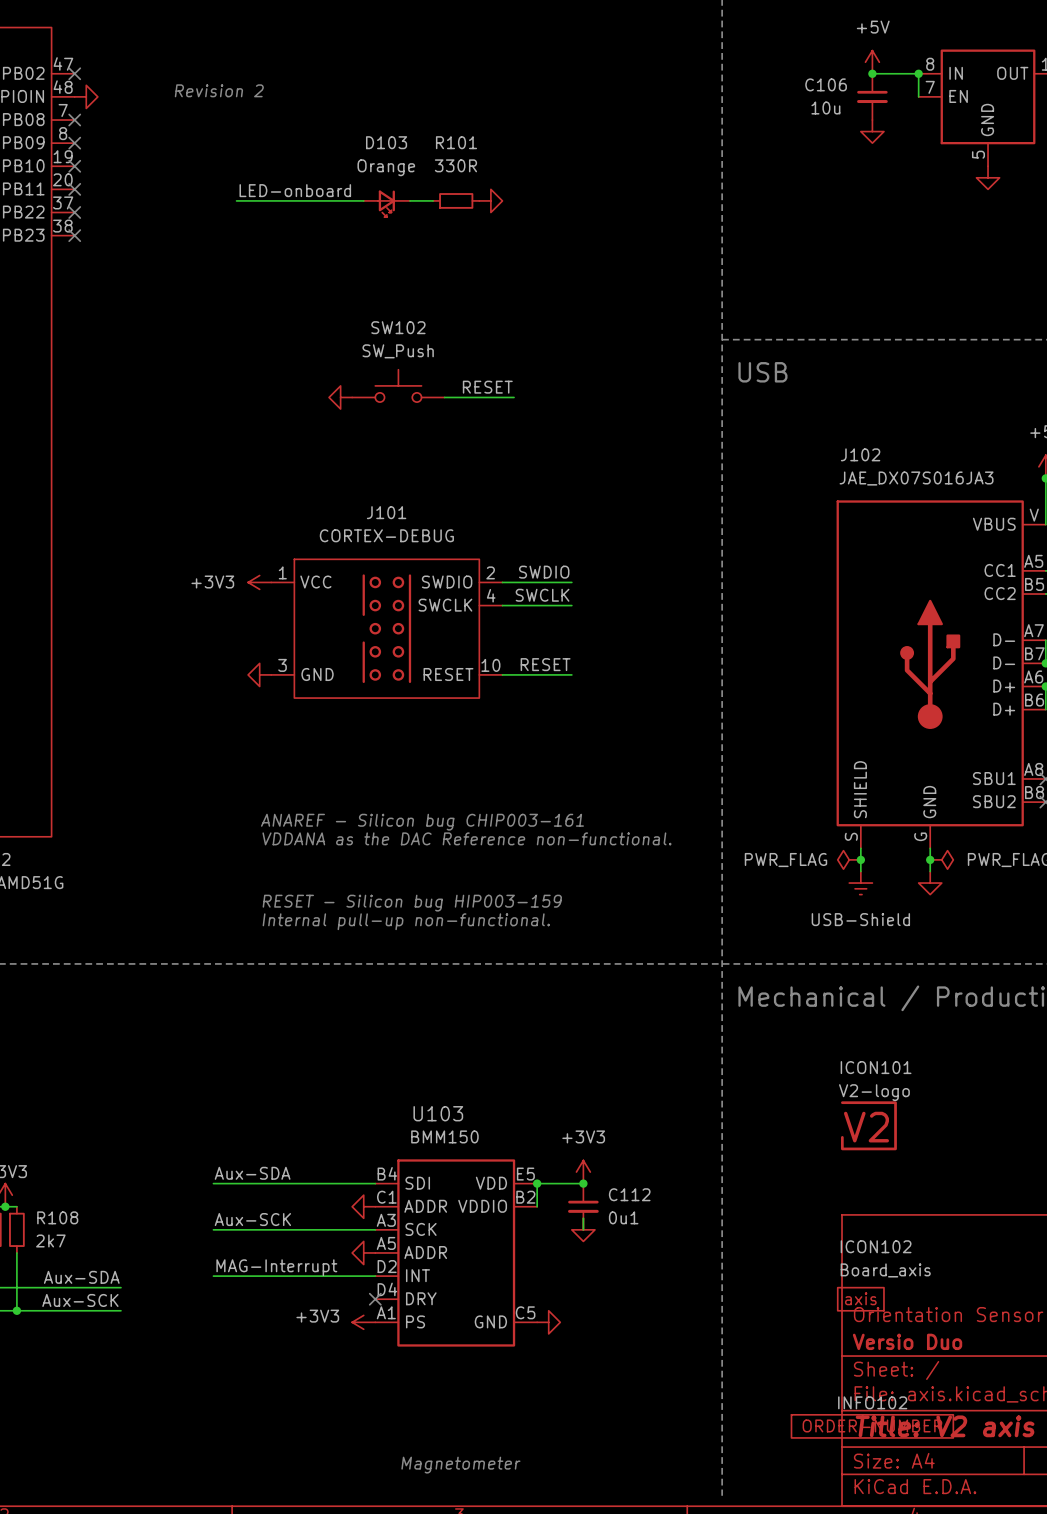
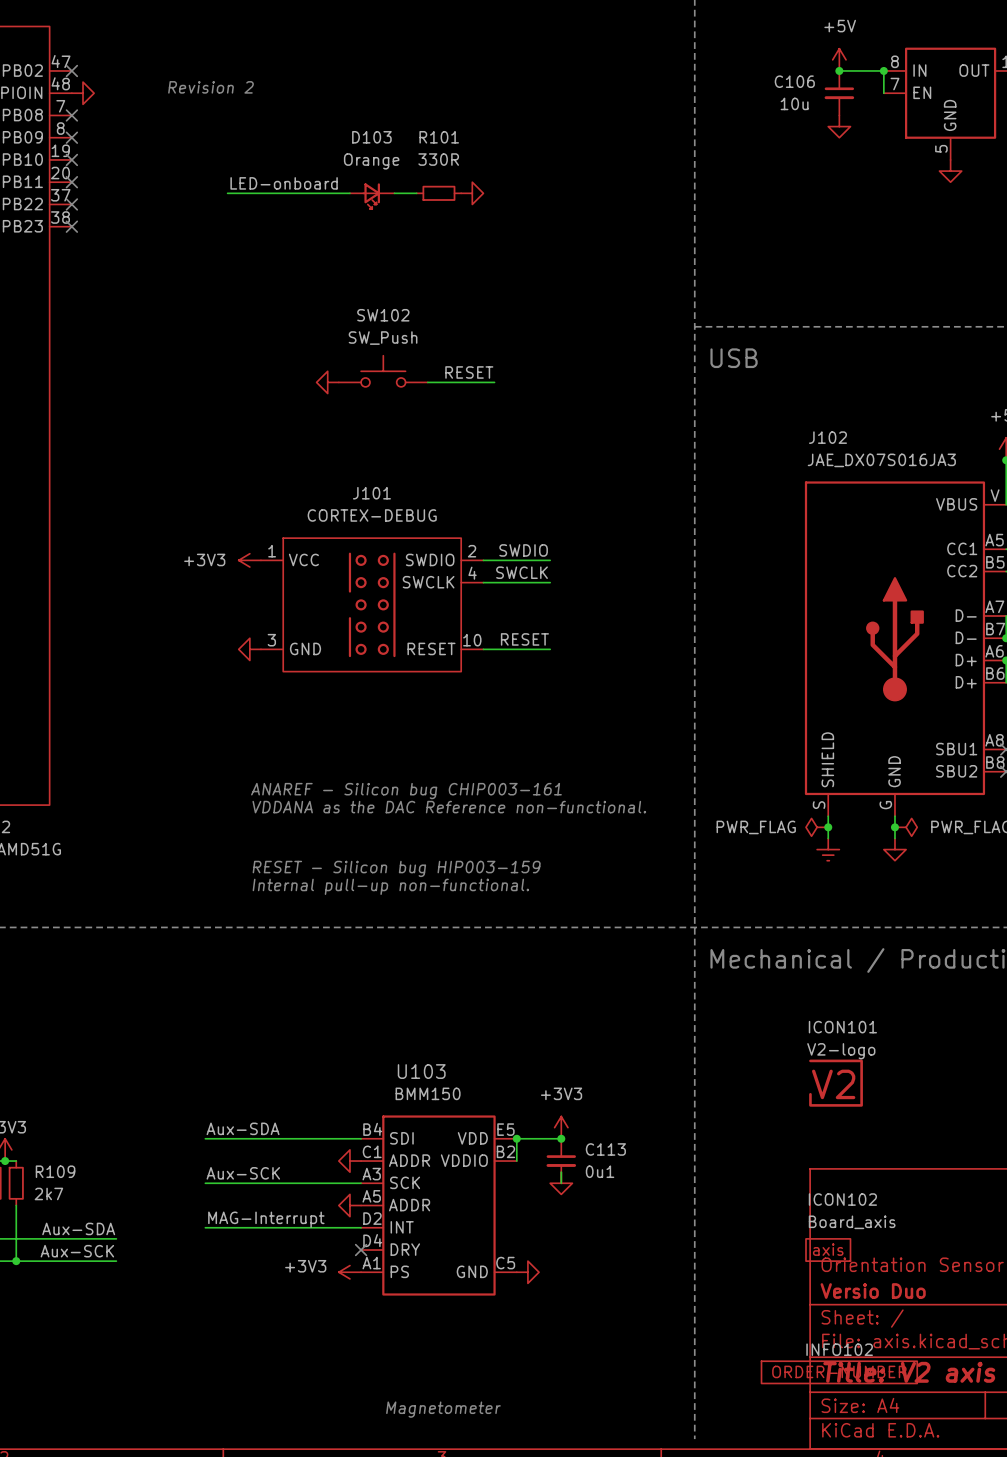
power symbol text: USB-Shield (860, 919) -> none
C112 name: C112 (629, 1194) -> C113 (605, 1149)
R108 name: R108 (57, 1217) -> R109 (55, 1171)

